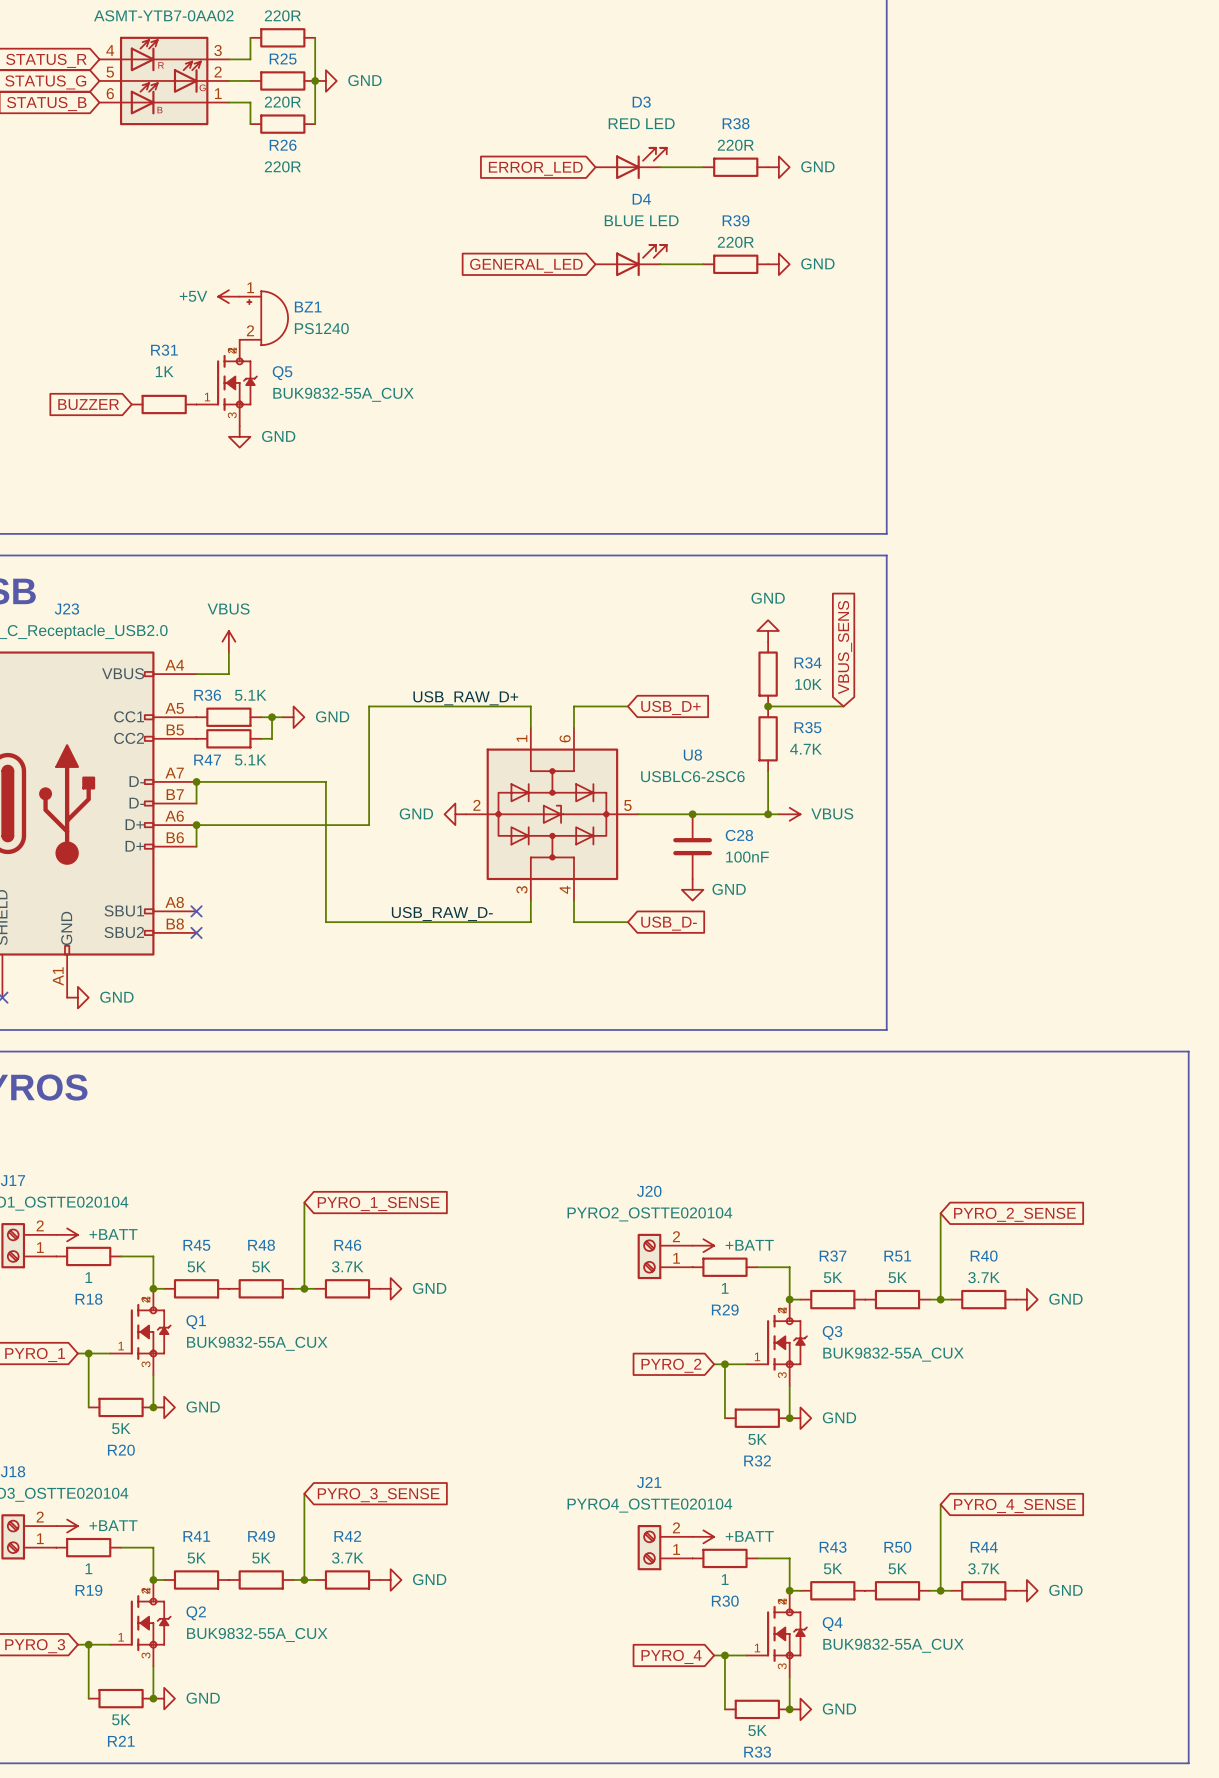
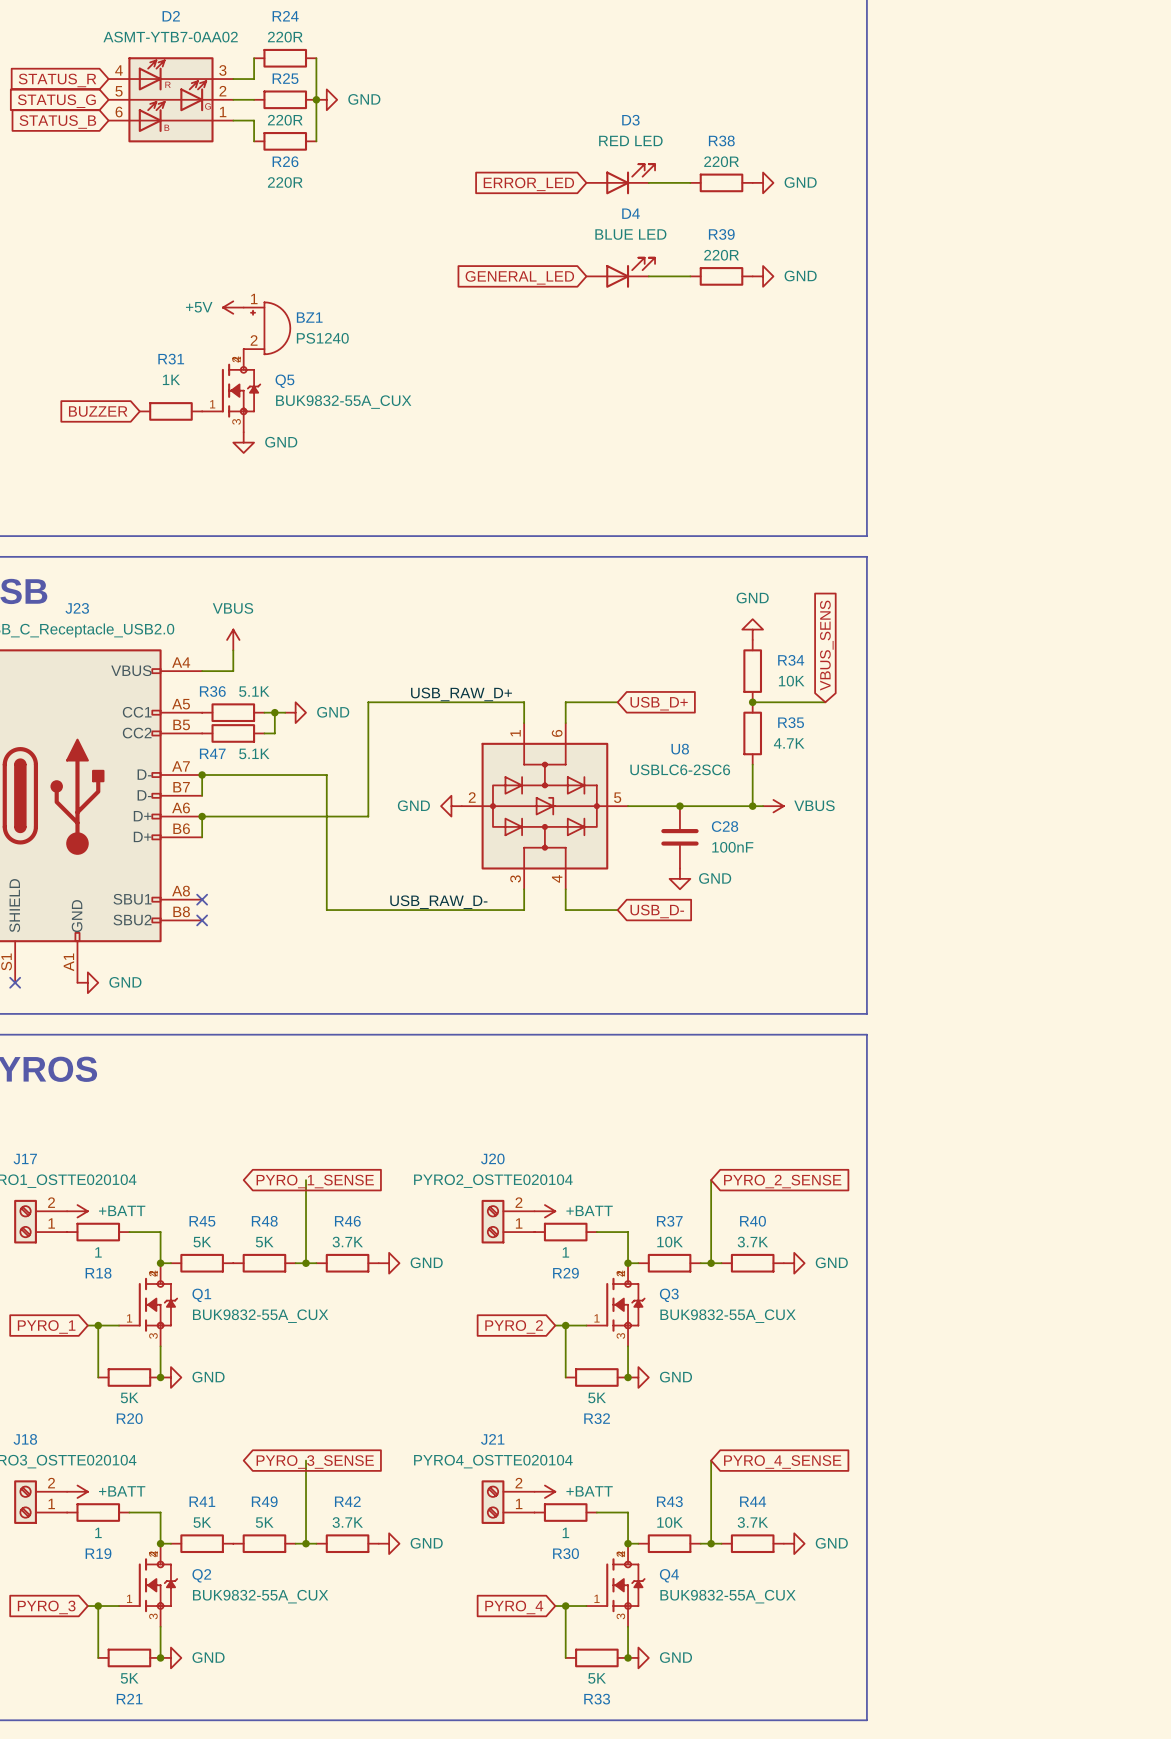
line: (886, 1051) (1188, 1051) (1188, 1763) (886, 1763) -> (866, 1034) (866, 1720)
wire: none -> (711, 1180) (711, 1263)
global label position: PYRO_1_SENSE (378, 1204) -> PYRO_1_SENSE (315, 1181)
global label: none -> PYRO_2_SENSE (782, 1181)
wire: (940, 1213) (940, 1299) -> none
global label: PYRO_2_SENSE (1014, 1214) -> none
power symbol position: +BATT (703, 1245) -> +BATT (544, 1211)
J20 position: (665, 1256) -> (508, 1221)
R29 position: (724, 1267) -> (565, 1232)
wire: (757, 1267) (789, 1267) (789, 1299) (800, 1299) -> (596, 1232) (628, 1232) (628, 1263) (638, 1263)
R37 value: 5K (833, 1277) -> 10K (670, 1242)
junction: none -> (628, 1263)
wire: none -> (700, 1263) (721, 1263)
junction: none -> (711, 1263)
power symbol: none -> GND (794, 1263)
junction: (789, 1299) -> none
R37 position: (832, 1299) -> (669, 1263)
R51: 5K (897, 1299) -> none
wire: (929, 1299) (951, 1299) -> none
junction: (940, 1299) -> none
R40 position: (983, 1299) -> (752, 1263)
power symbol: GND (1026, 1299) -> none
Q3 position: (777, 1342) -> (615, 1304)
junction: none -> (565, 1325)
wire: (714, 1364) (746, 1364) -> (555, 1325) (586, 1325)
wire: (724, 1364) (724, 1418) -> (565, 1325) (565, 1377)
junction: (724, 1364) -> none
global label position: PYRO_2 (671, 1365) -> PYRO_2 (514, 1326)
wire: (789, 1385) (789, 1418) -> (628, 1346) (628, 1377)
junction: none -> (628, 1377)
power symbol: none -> GND (638, 1377)
R32 position: (757, 1418) -> (596, 1377)
junction: (789, 1418) -> none
power symbol: GND (800, 1418) -> none
wire: none -> (711, 1460) (711, 1543)
global label position: PYRO_3_SENSE (378, 1495) -> PYRO_3_SENSE (315, 1462)
global label: none -> PYRO_4_SENSE (782, 1462)
wire: (940, 1504) (940, 1590) -> none
global label: PYRO_4_SENSE (1014, 1505) -> none
power symbol position: +BATT (703, 1536) -> +BATT (544, 1491)
J21 position: (665, 1547) -> (508, 1502)
R30 position: (724, 1558) -> (565, 1512)
wire: (757, 1558) (789, 1558) (789, 1590) (800, 1590) -> (596, 1512) (628, 1512) (628, 1543) (638, 1543)
R43 value: 5K (833, 1568) -> 10K (670, 1522)
junction: none -> (628, 1543)
wire: none -> (700, 1543) (721, 1543)
junction: none -> (711, 1543)
power symbol: none -> GND (794, 1543)
junction: (789, 1590) -> none
R43 position: (832, 1590) -> (669, 1543)
R50: 5K (897, 1590) -> none
wire: (929, 1590) (951, 1590) -> none
junction: (940, 1590) -> none
R44 position: (983, 1590) -> (752, 1543)
power symbol: GND (1026, 1590) -> none
Q4 position: (777, 1633) -> (615, 1585)
junction: none -> (565, 1606)
wire: (714, 1655) (746, 1655) -> (555, 1606) (586, 1606)
wire: (724, 1655) (724, 1709) -> (565, 1606) (565, 1657)
junction: (724, 1655) -> none
global label position: PYRO_4 (671, 1656) -> PYRO_4 (514, 1607)
wire: (789, 1677) (789, 1709) -> (628, 1626) (628, 1657)
junction: none -> (628, 1657)
power symbol: none -> GND (638, 1657)
R33 position: (757, 1709) -> (596, 1657)
junction: (789, 1709) -> none
power symbol: GND (800, 1709) -> none

